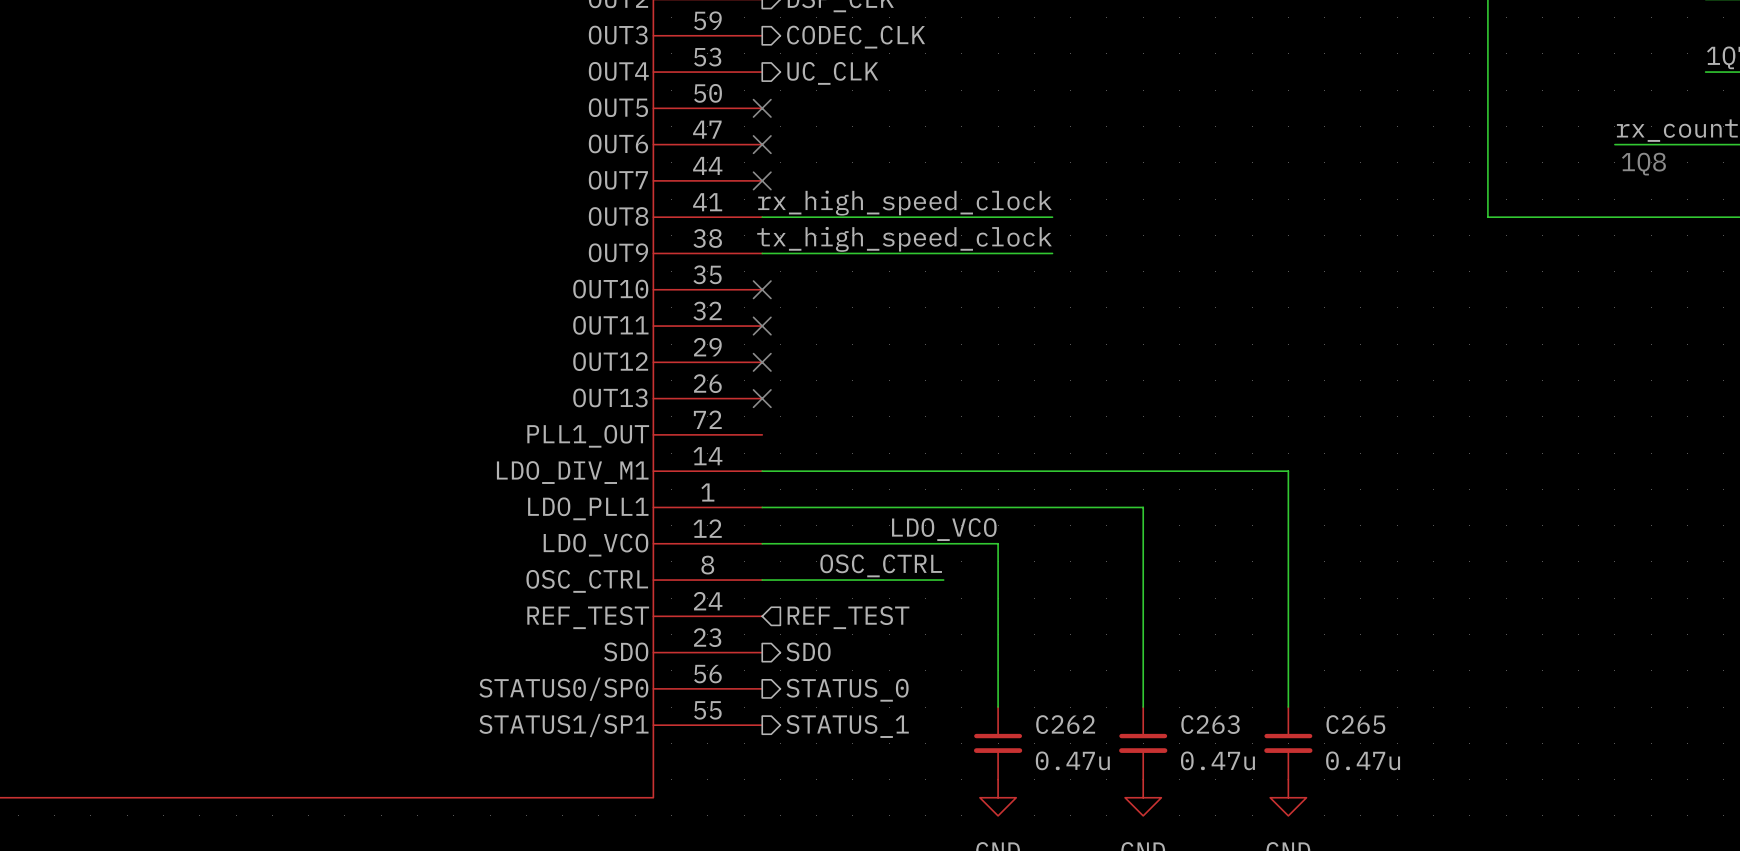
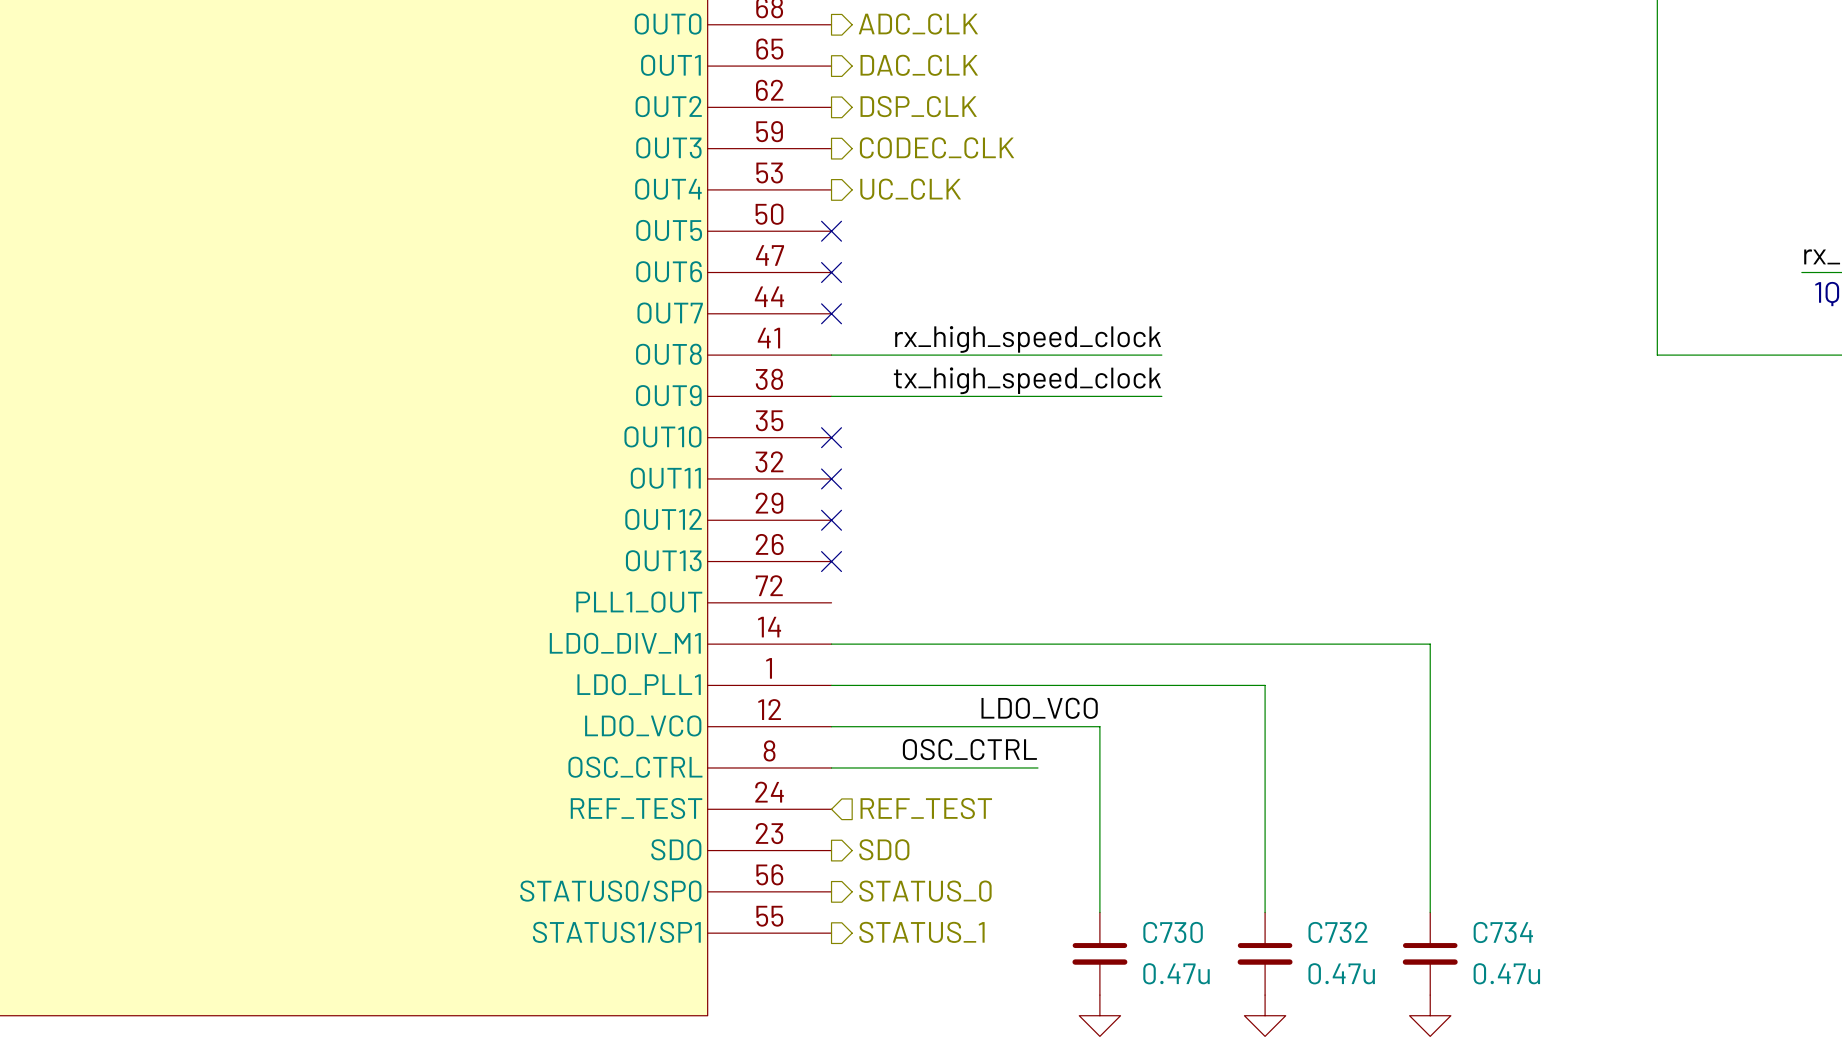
C262 name: C262 (1065, 724) -> C730 (1173, 932)
C263 name: C263 (1210, 724) -> C732 (1337, 932)
C265 name: C265 (1355, 724) -> C734 (1503, 932)

